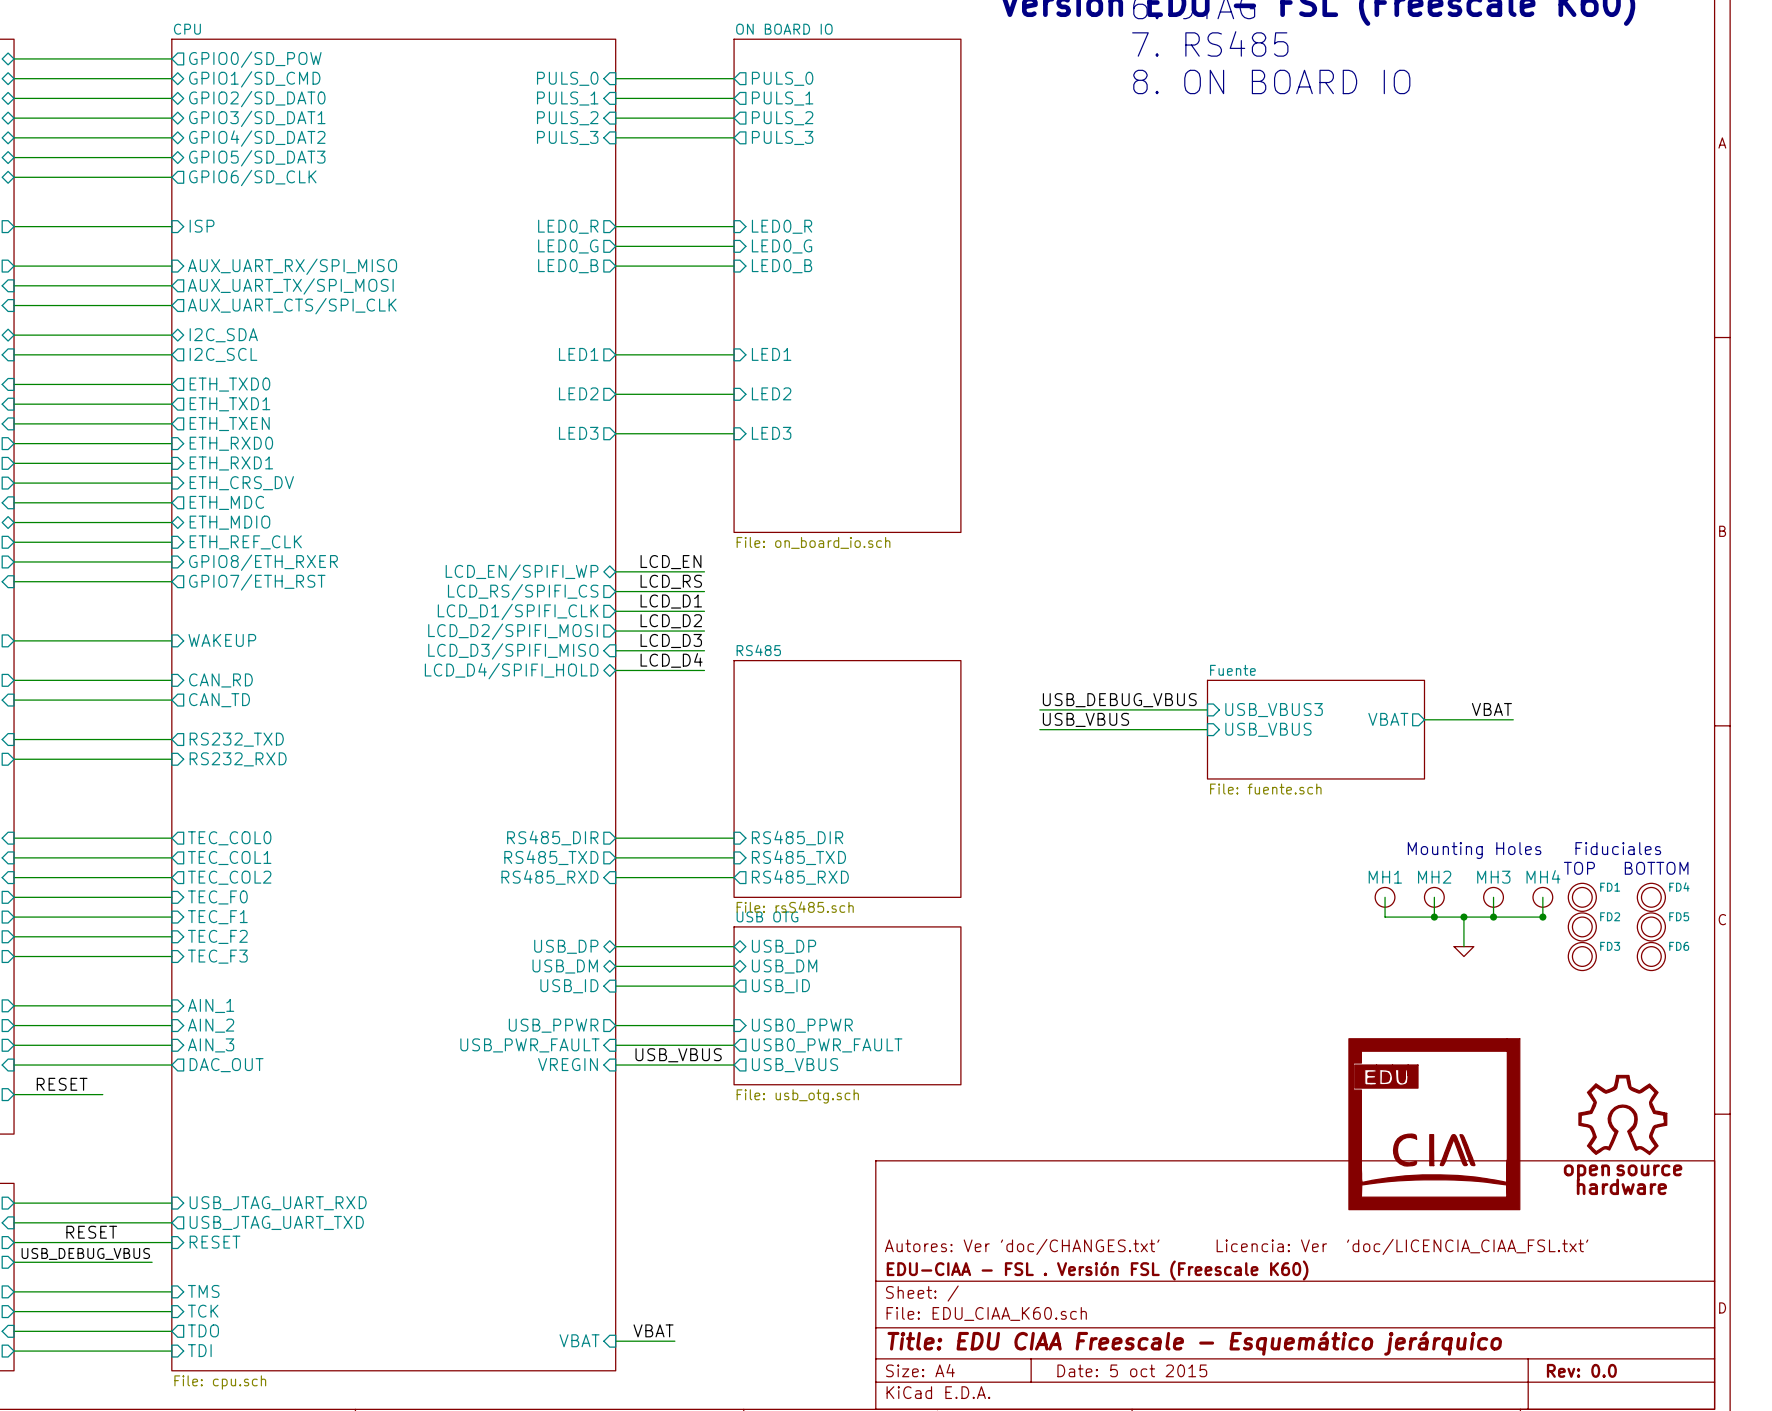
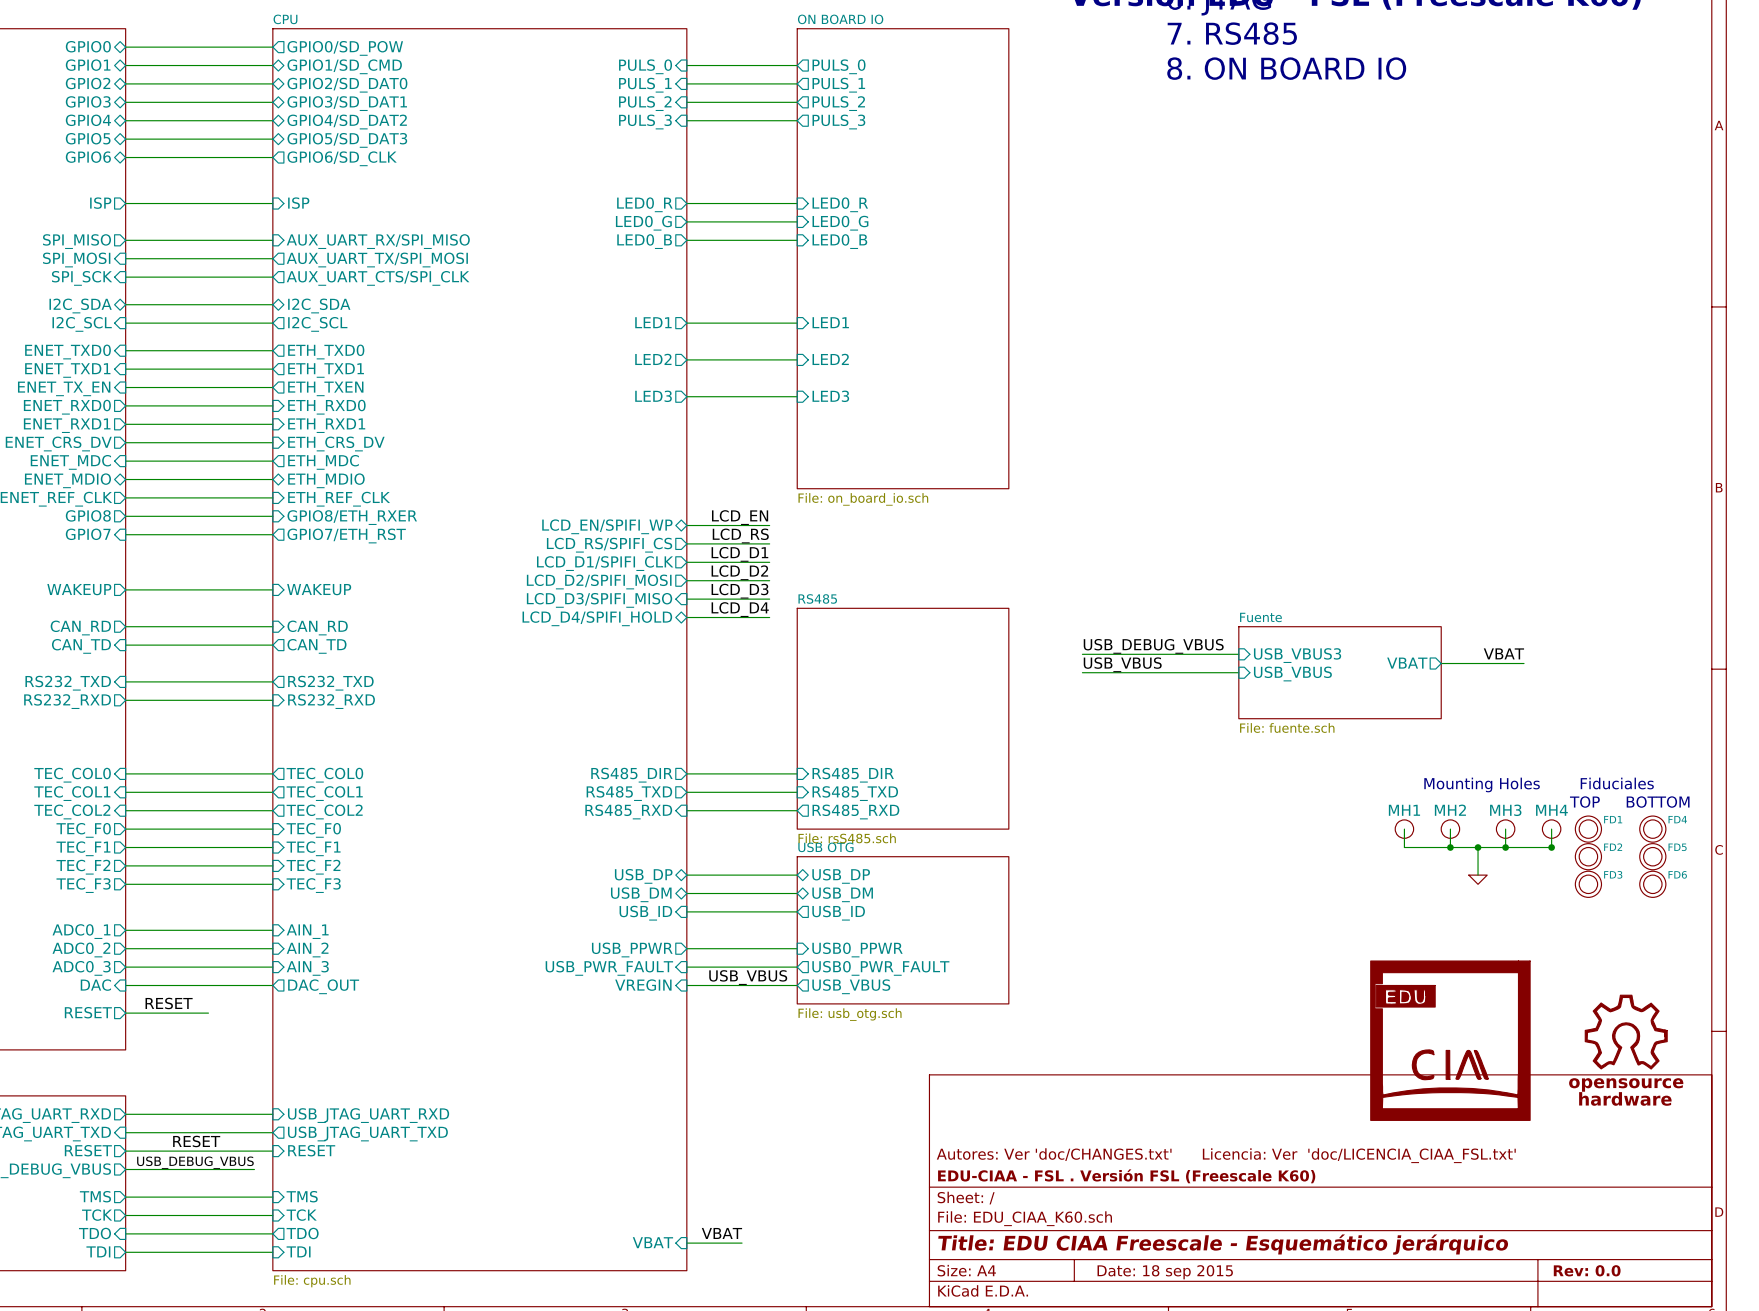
title block: Date: 5 oct 2015 (1132, 1370) -> Date: 18 sep 2015 (1165, 1272)

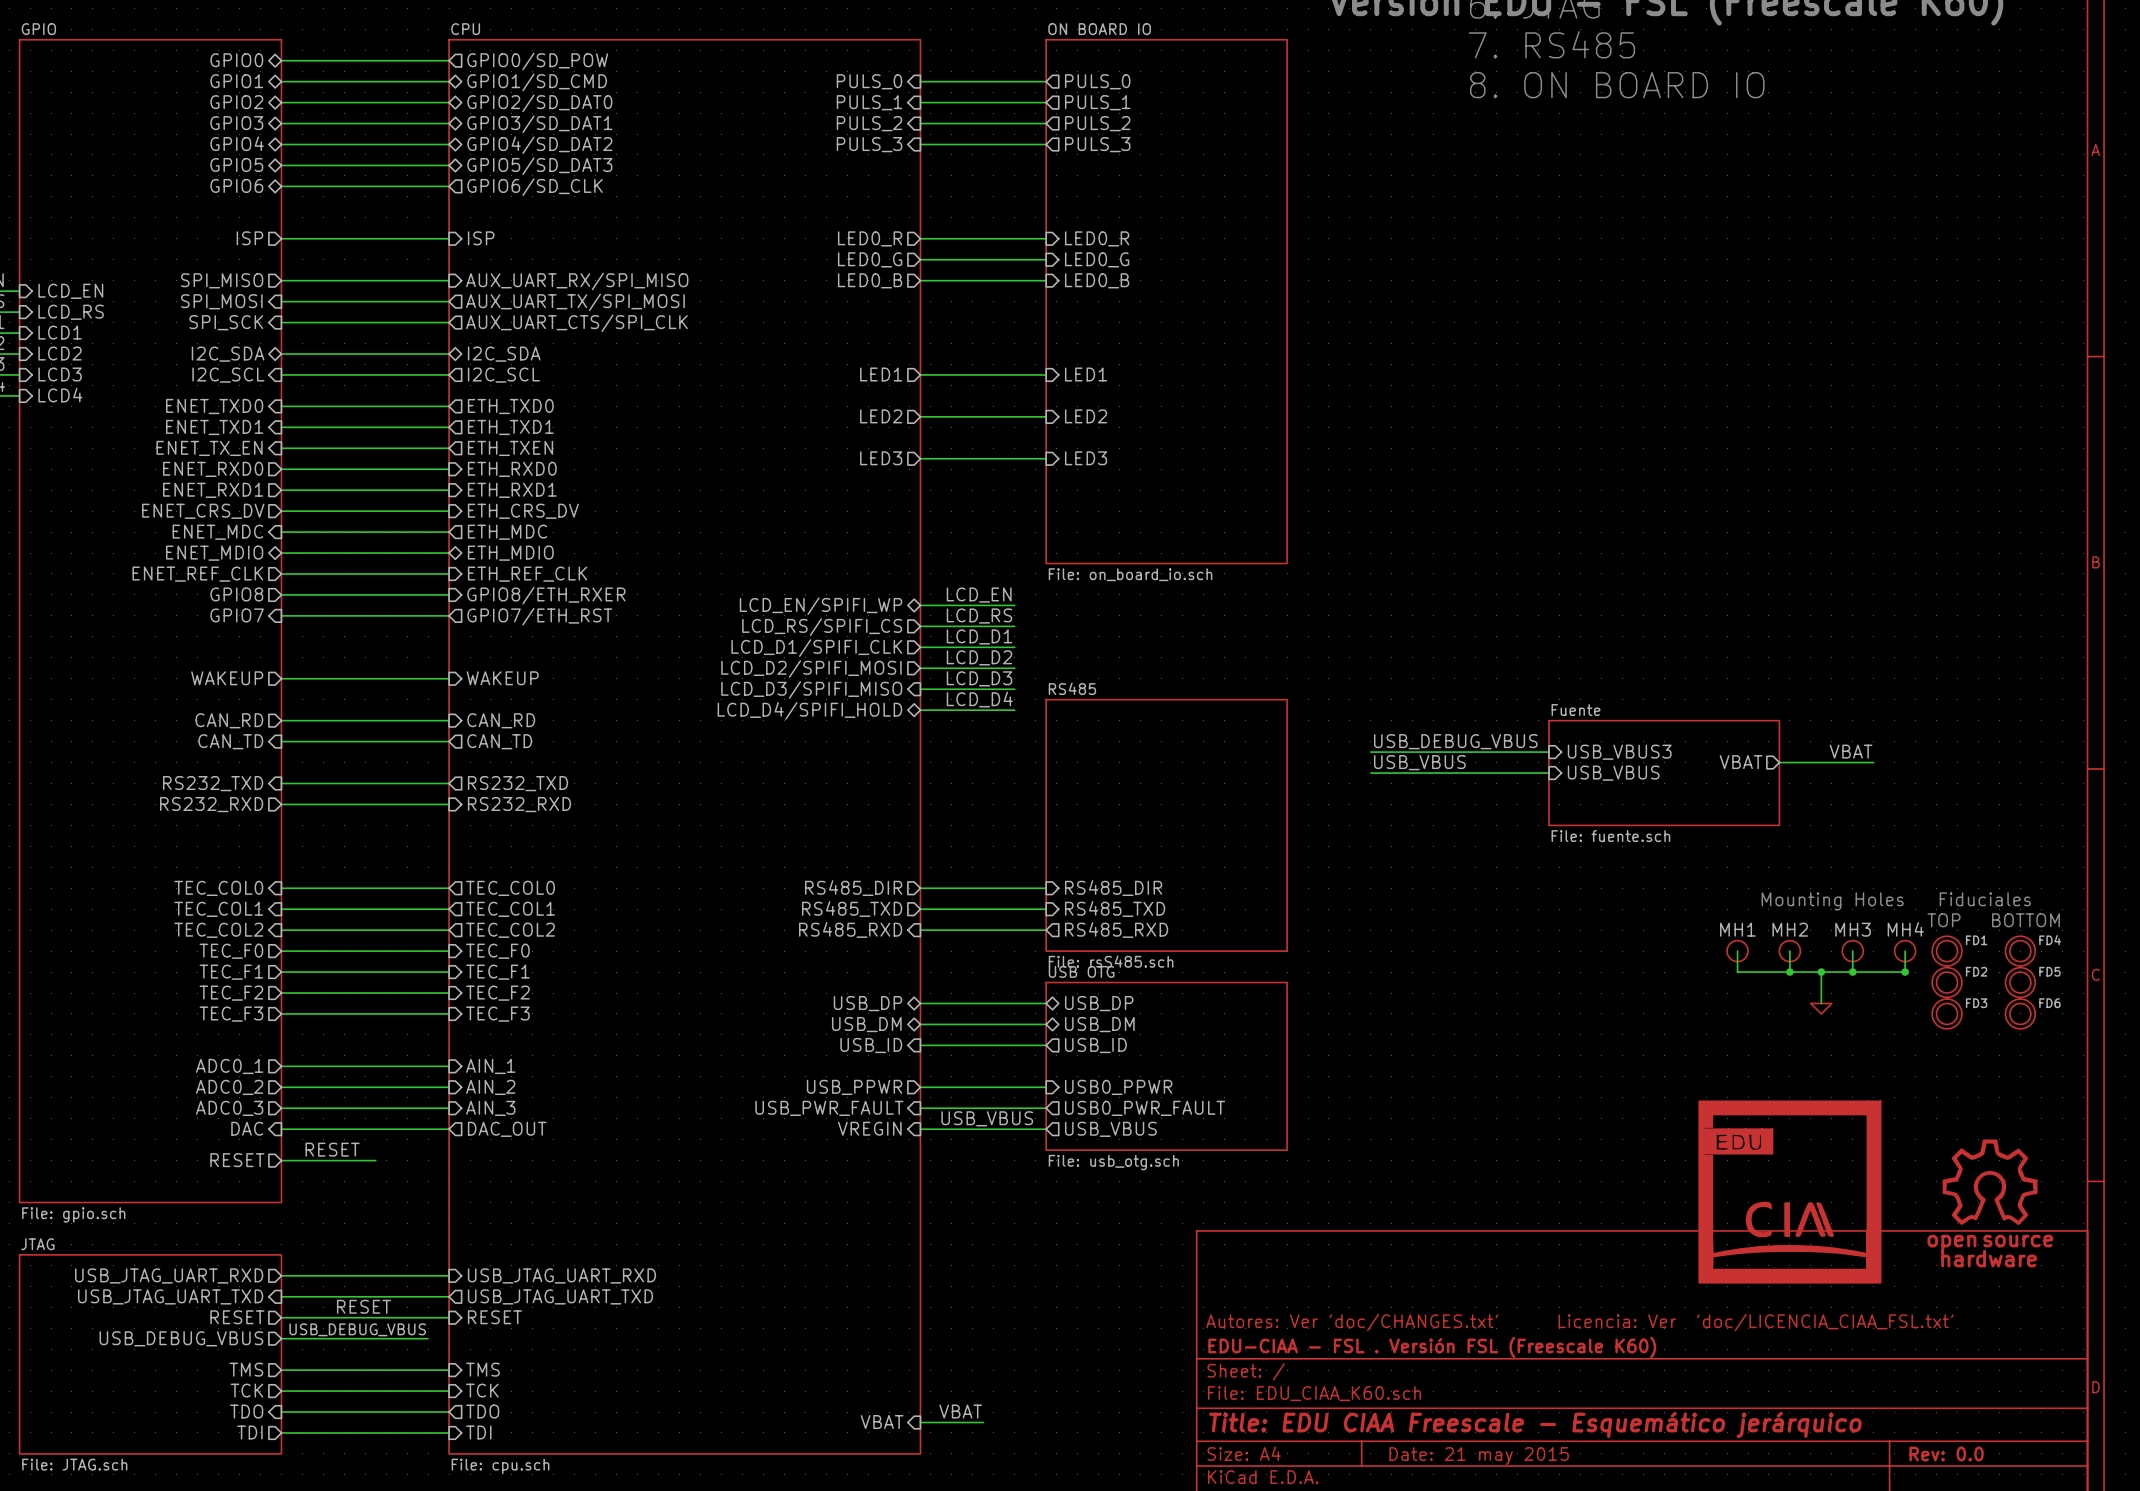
title block: Date: 18 sep 2015 (1165, 1272) -> Date: 21 may 2015 (1479, 1456)

